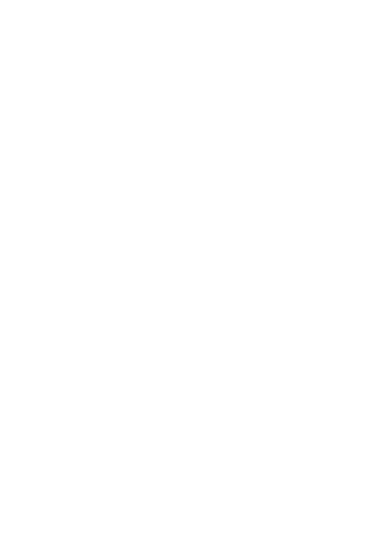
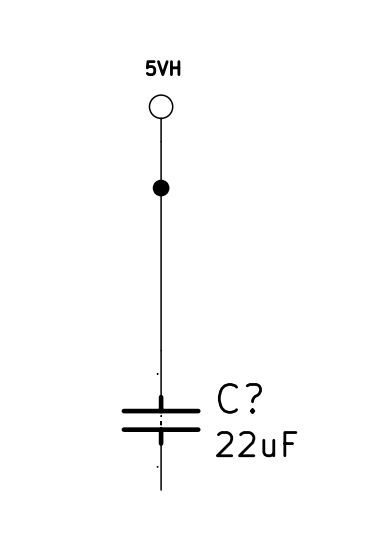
power symbol: none -> 5VH (161, 118)
wire: none -> (161, 141) (161, 350)
junction: none -> (161, 188)
C?: none -> 22uF (161, 420)

